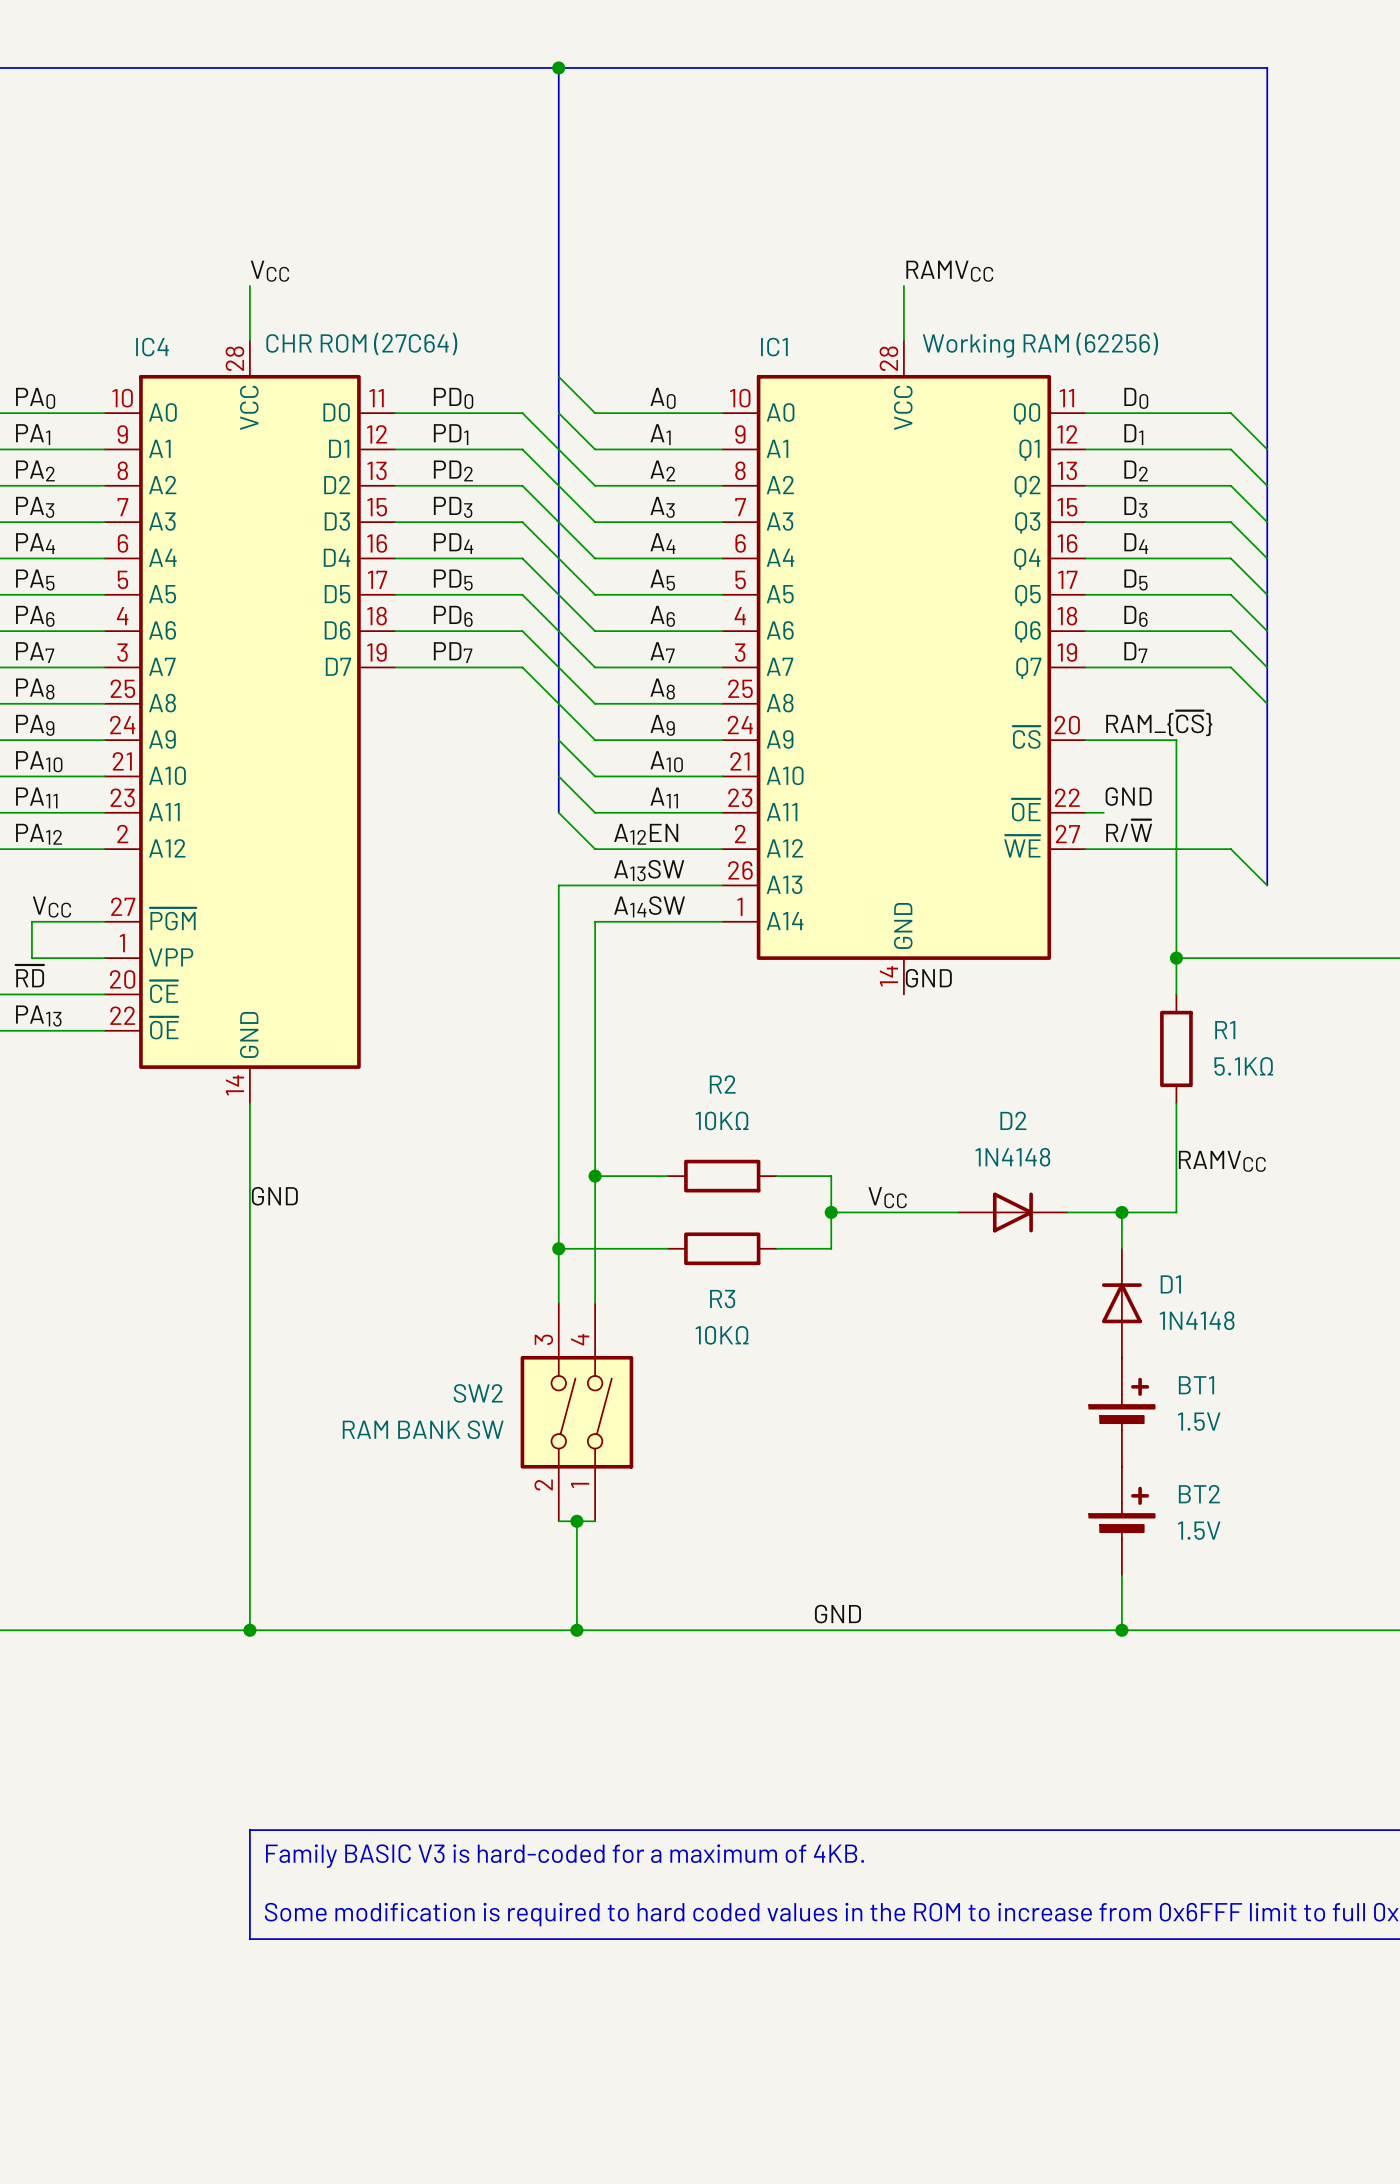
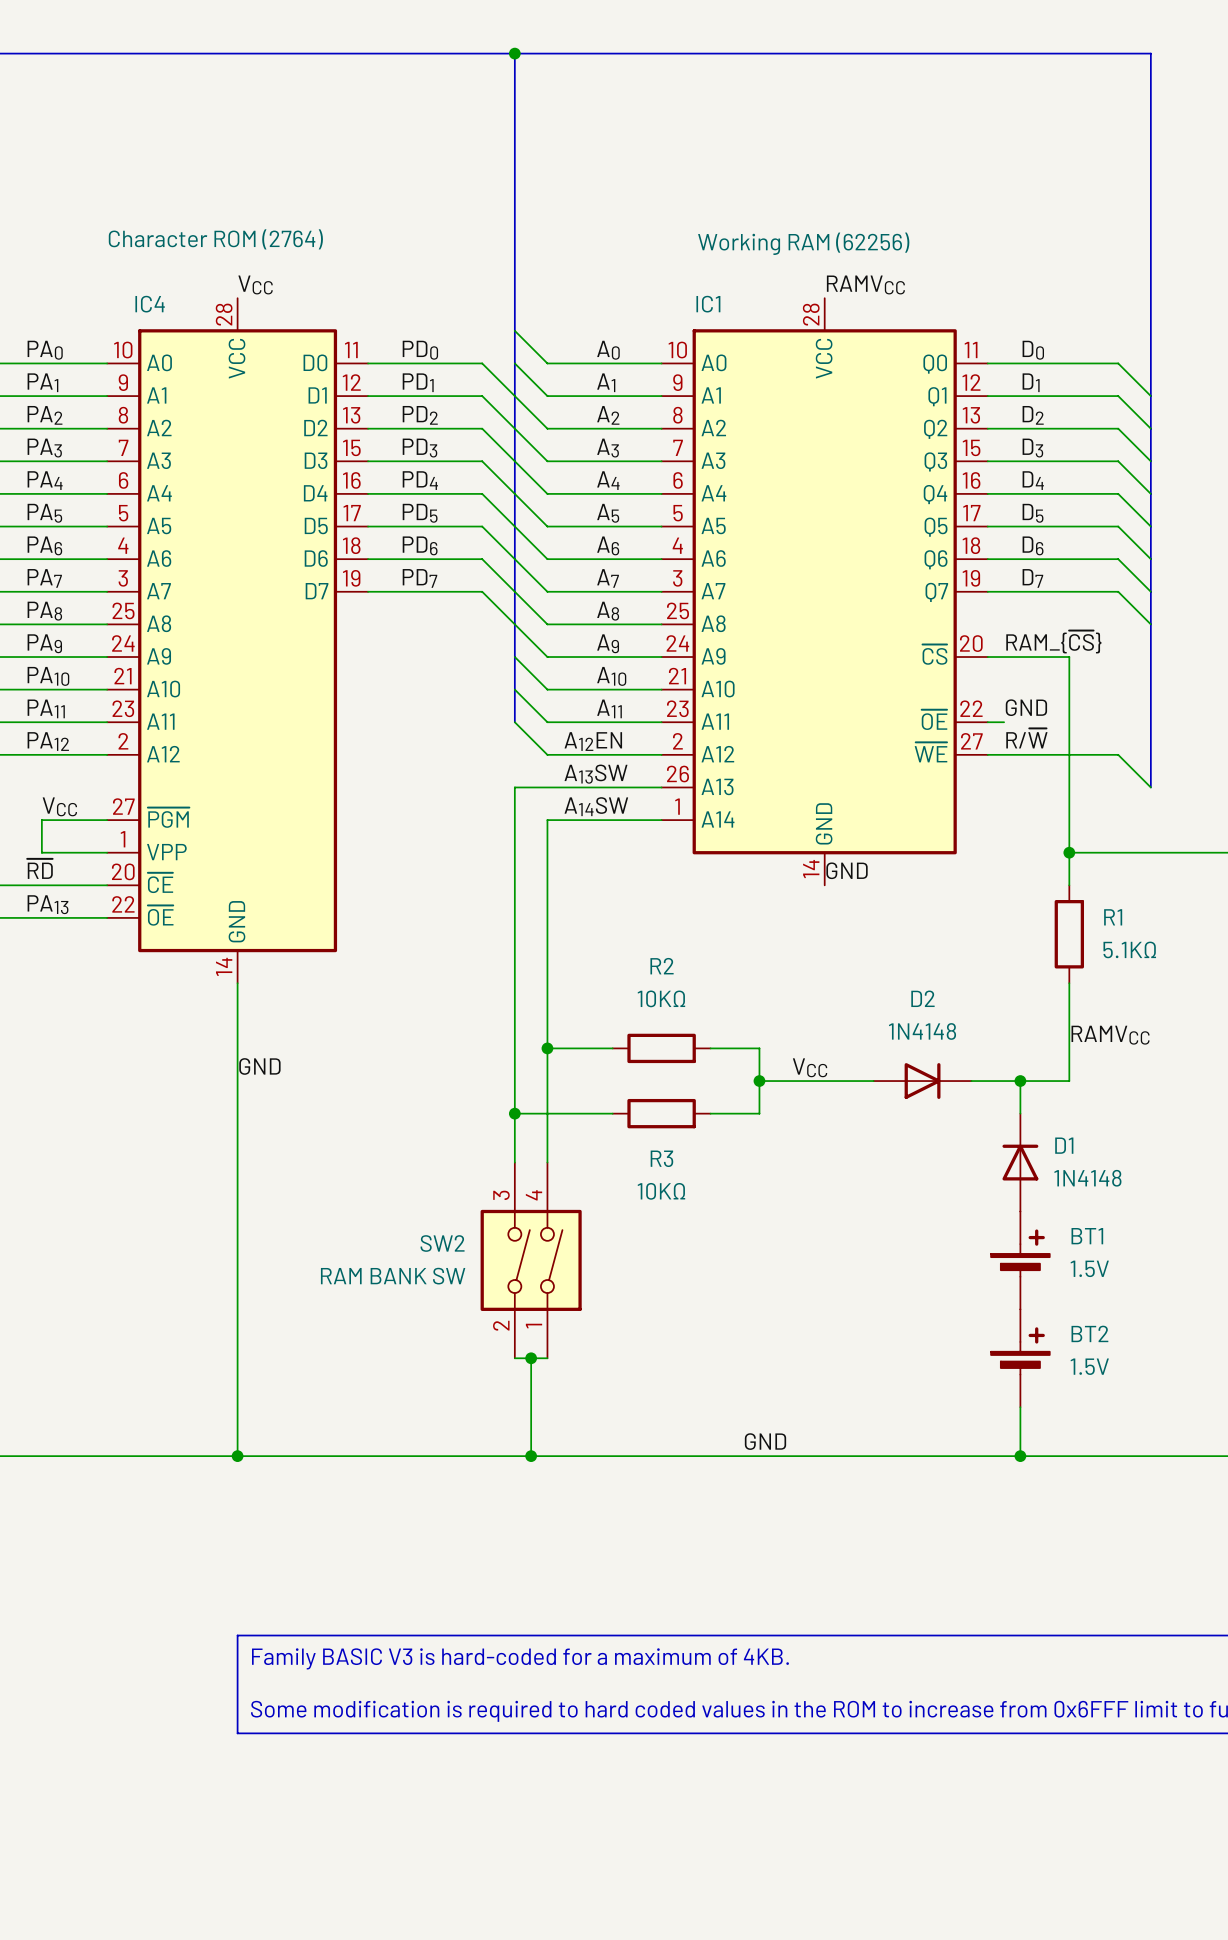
label position: VCC (269, 271) -> VCC (255, 284)
label position: RAMVCC (949, 271) -> RAMVCC (865, 284)
wire: (249, 285) (249, 340) -> none
wire: (903, 285) (903, 340) -> none
IC4 value: CHR ROM (27C64) (361, 343) -> Character ROM (2764) (215, 239)
IC1 value position: Working RAM (62256) (1040, 345) -> Working RAM (62256) (803, 243)

